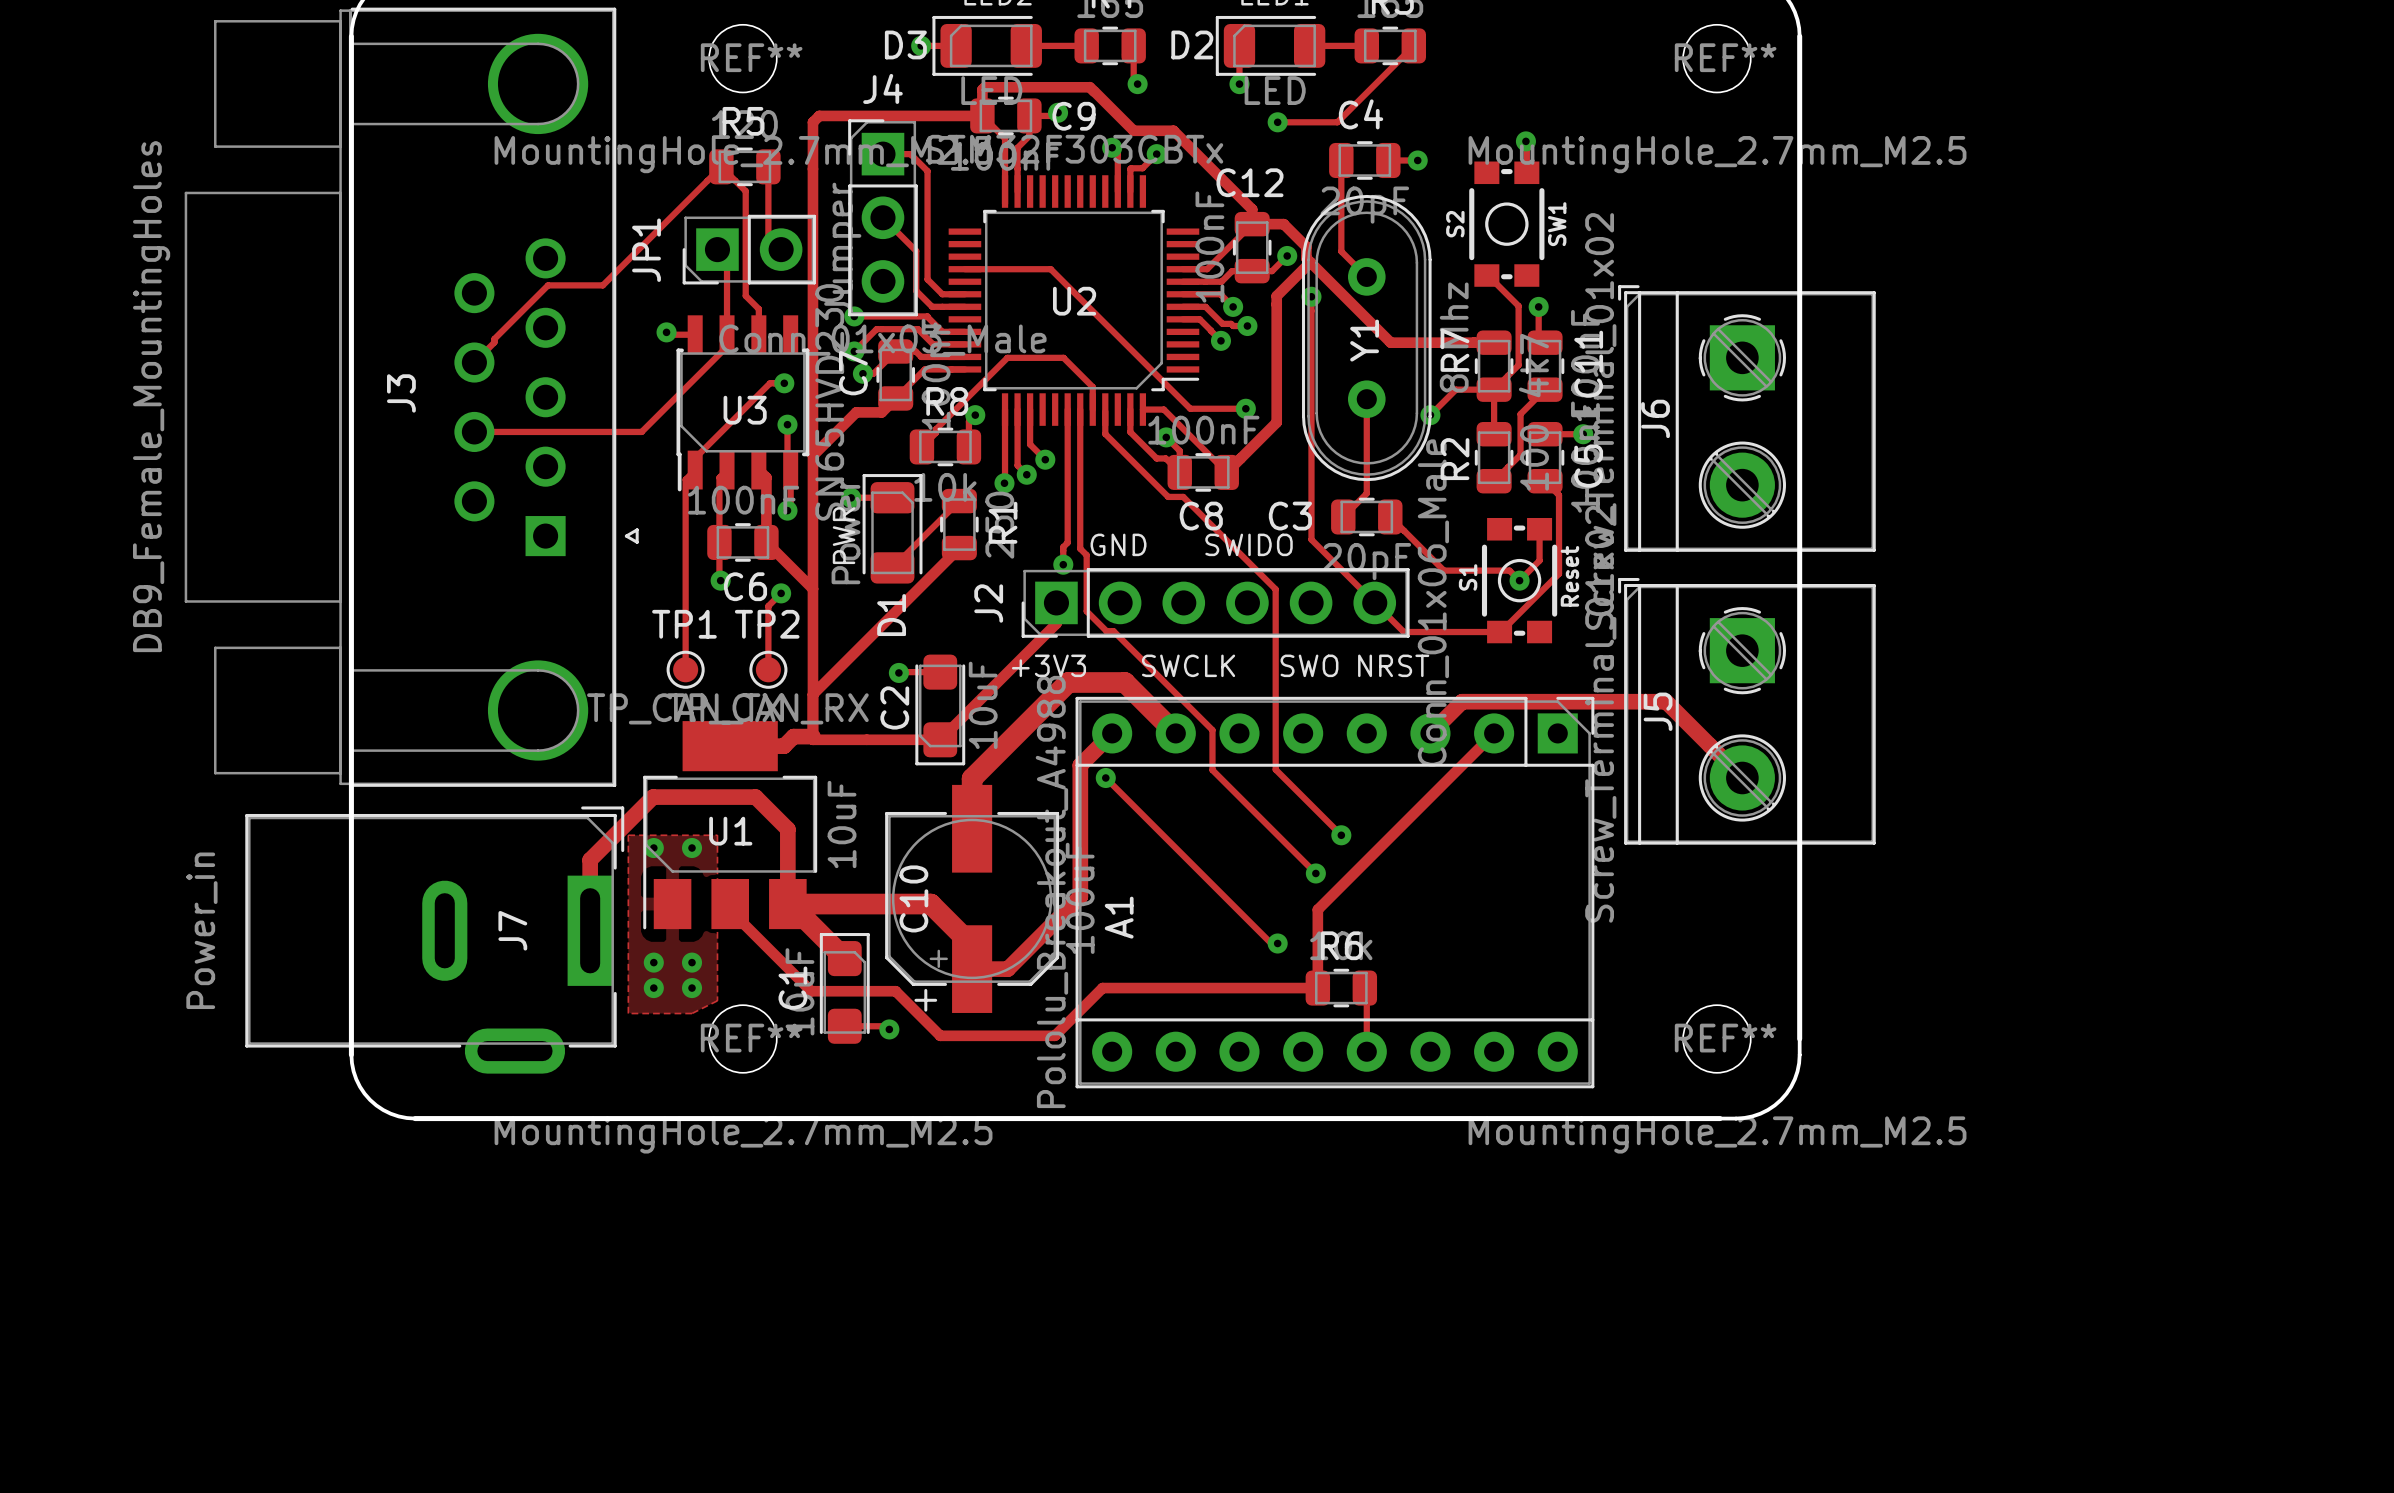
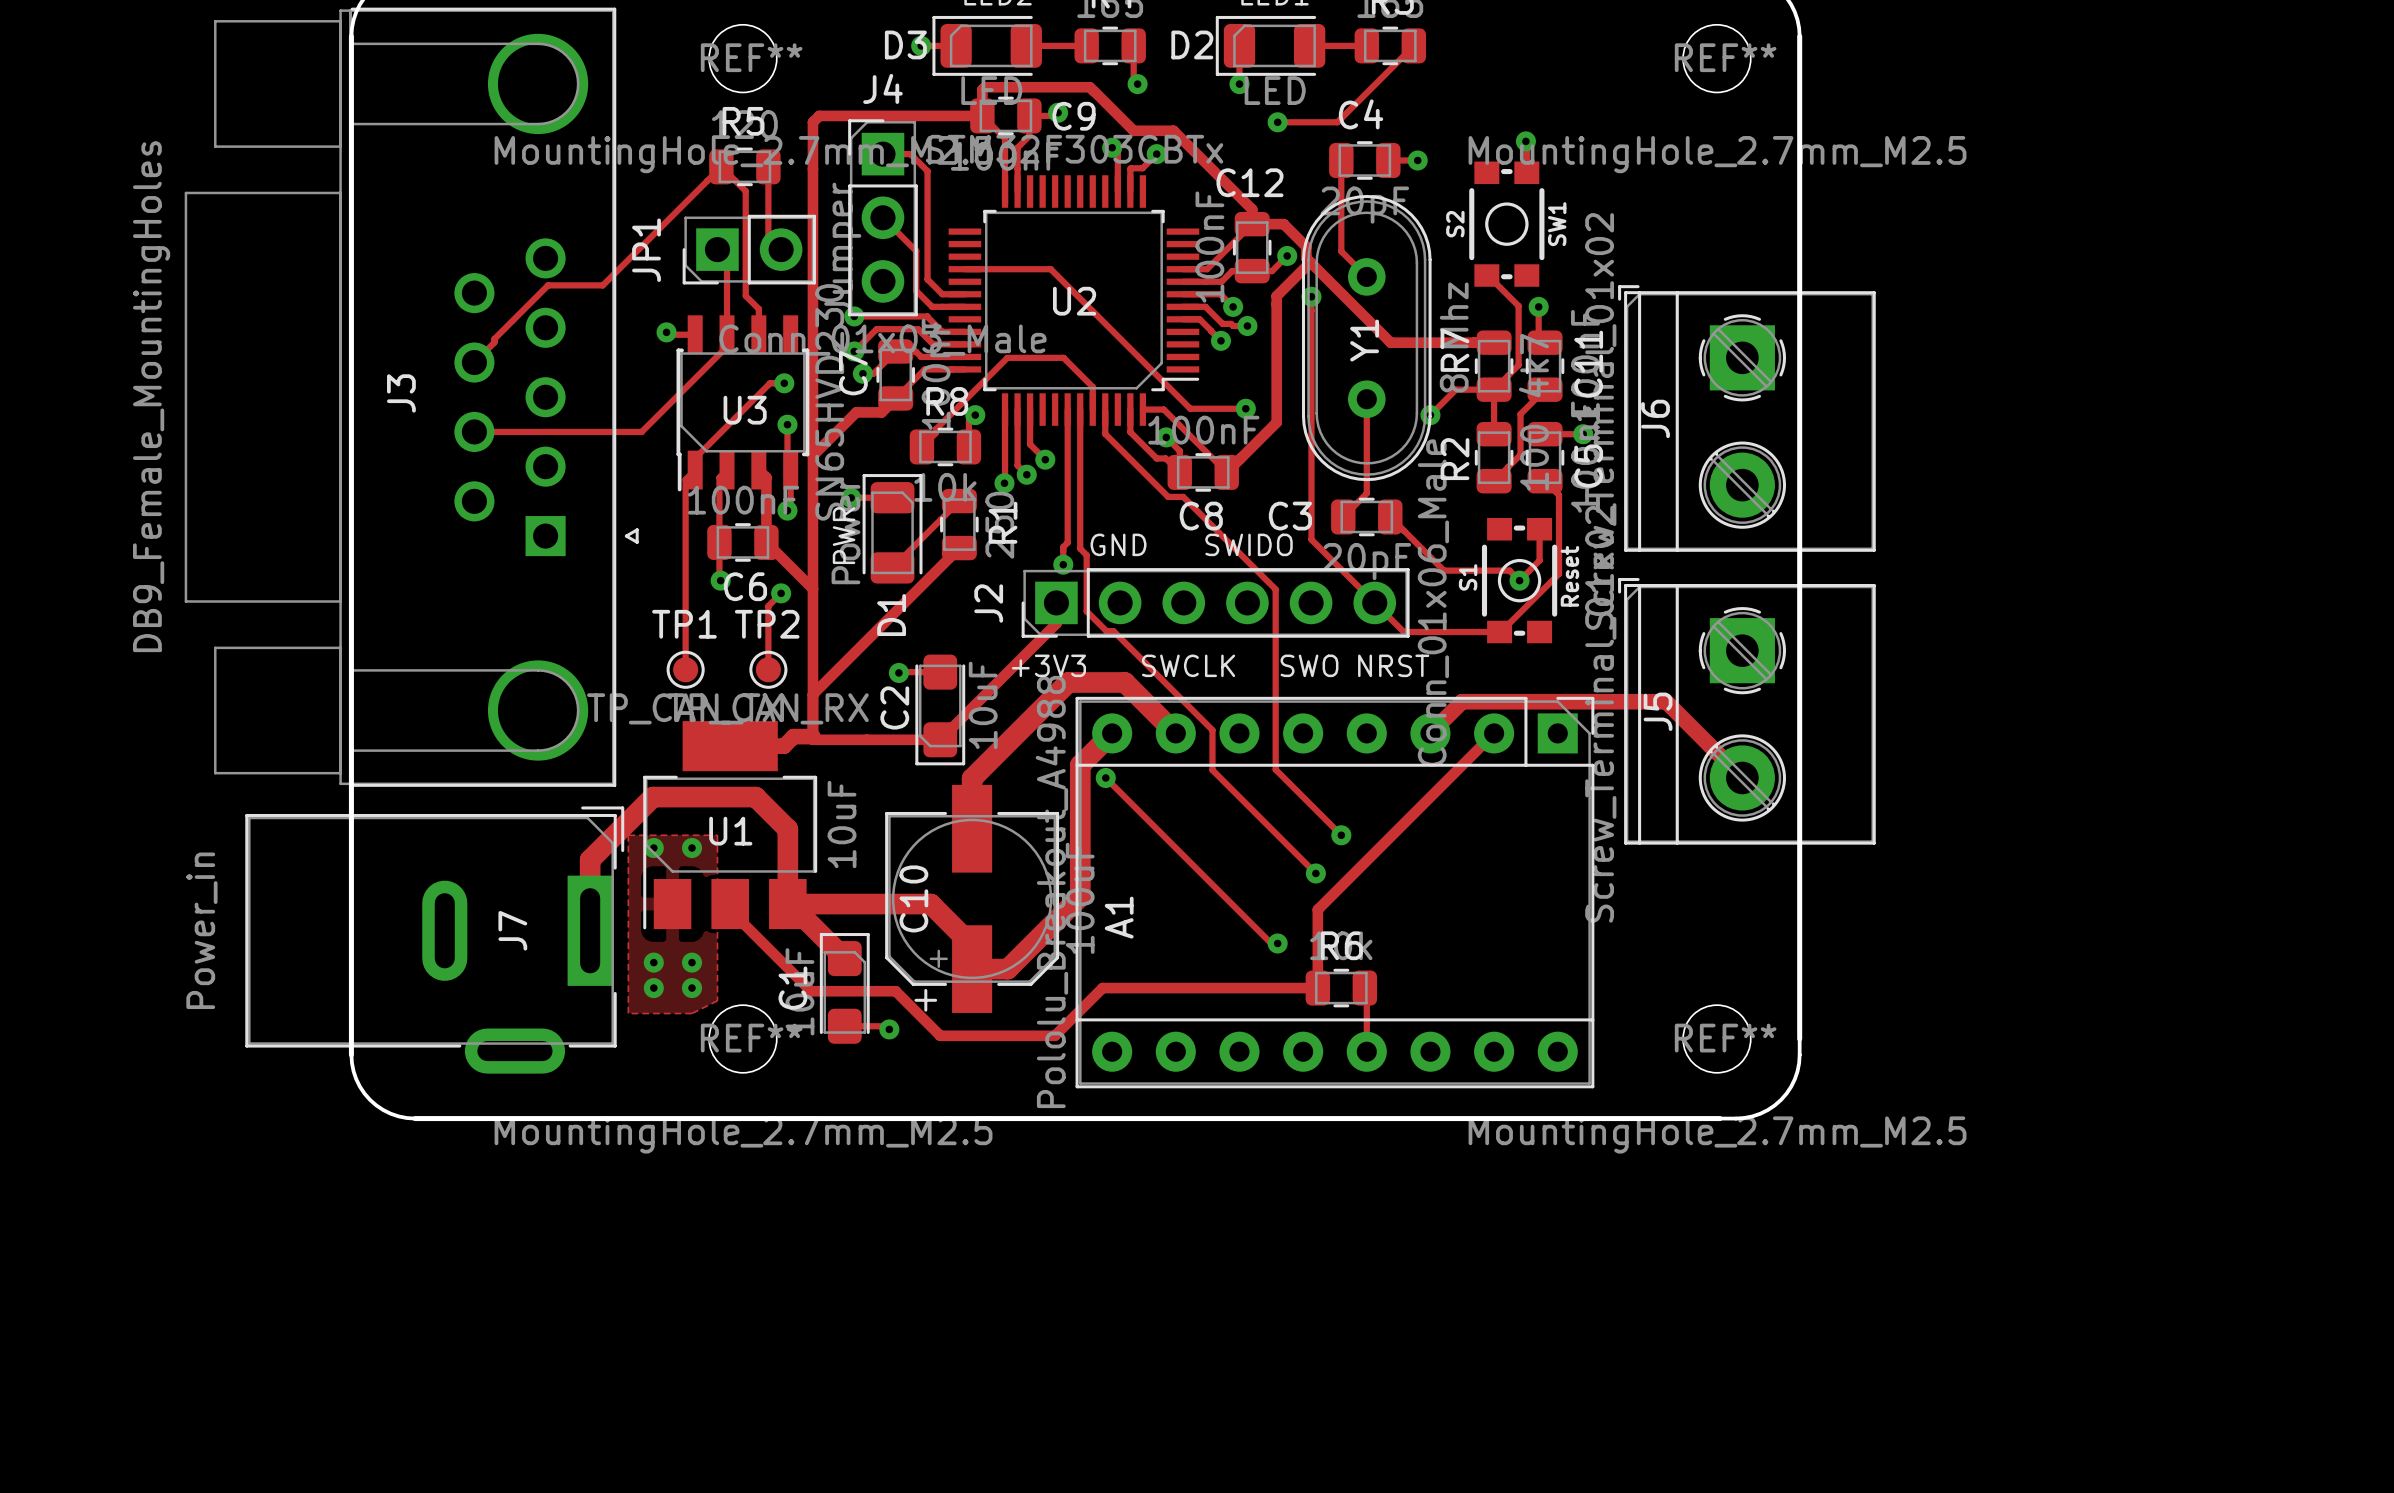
track width: thin (1112, 733) (1080, 765) (1080, 896) (1007, 969) (972, 969) -> thick (1112, 733) (1080, 765) (1080, 896) (1007, 969) (972, 969)
track width: thin (787, 897) (787, 829) (755, 797) (653, 797) (590, 859) (590, 898) -> thick (787, 897) (787, 829) (755, 797) (653, 797) (590, 859) (590, 898)

